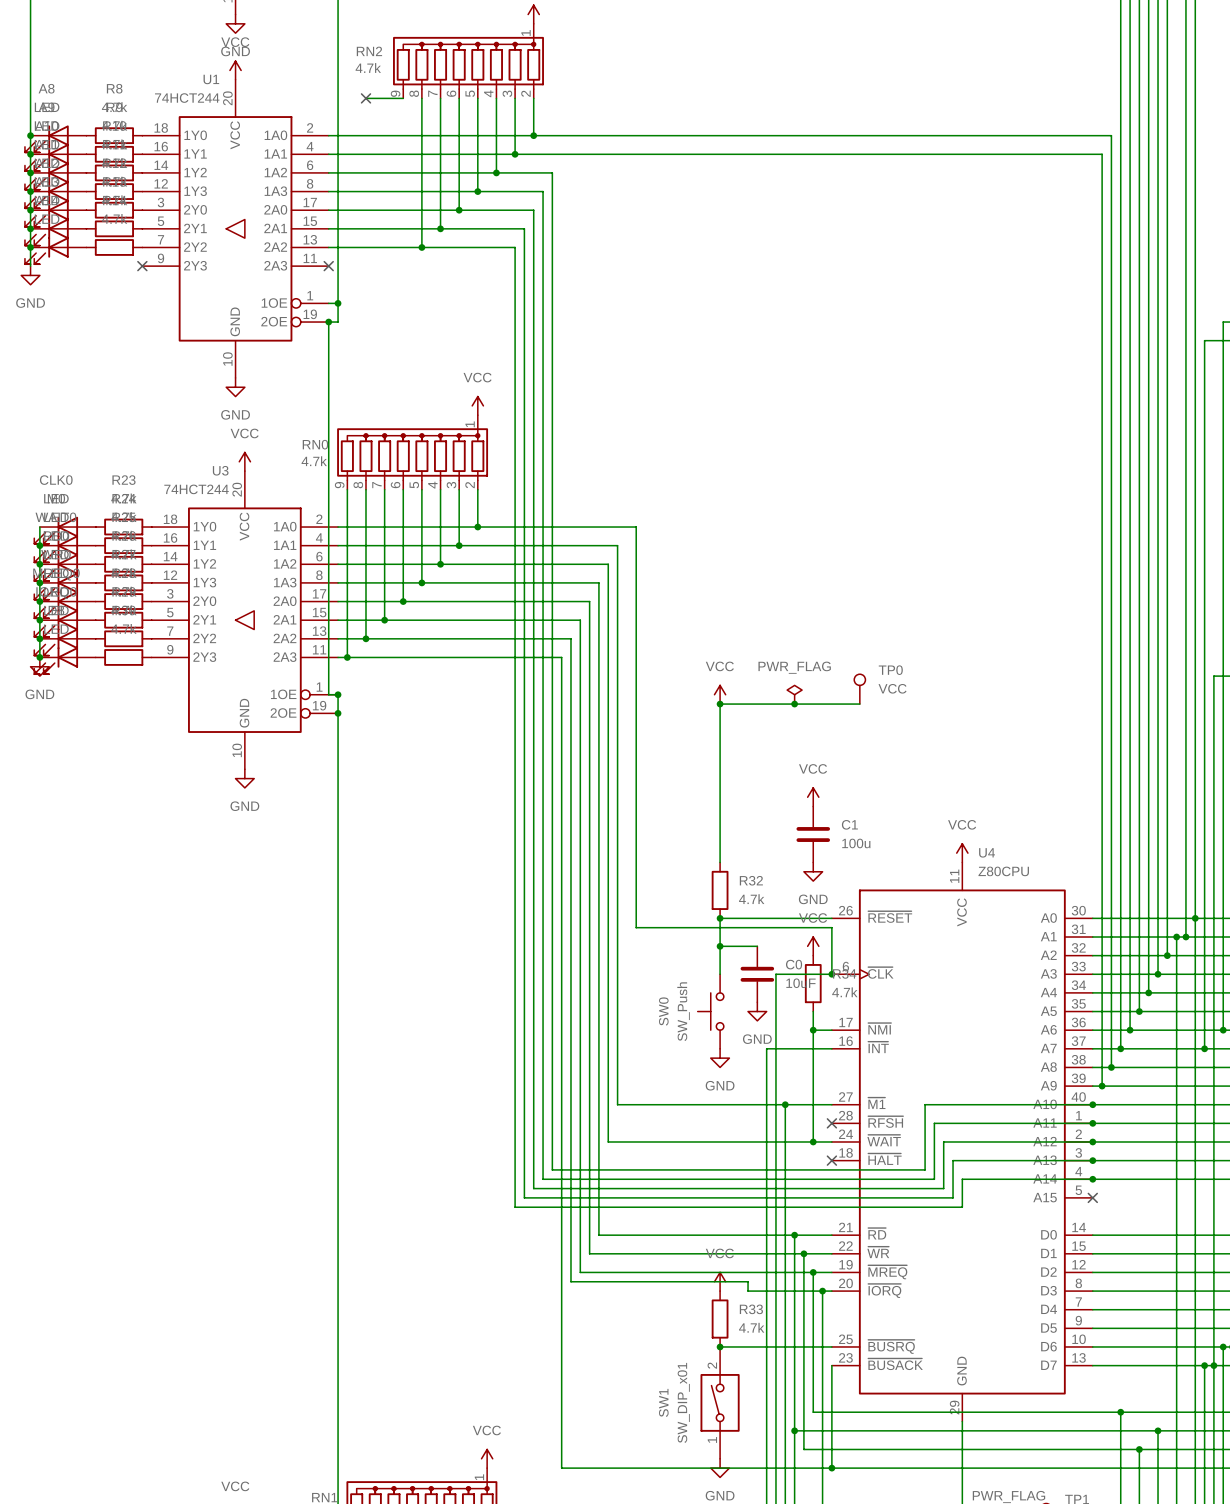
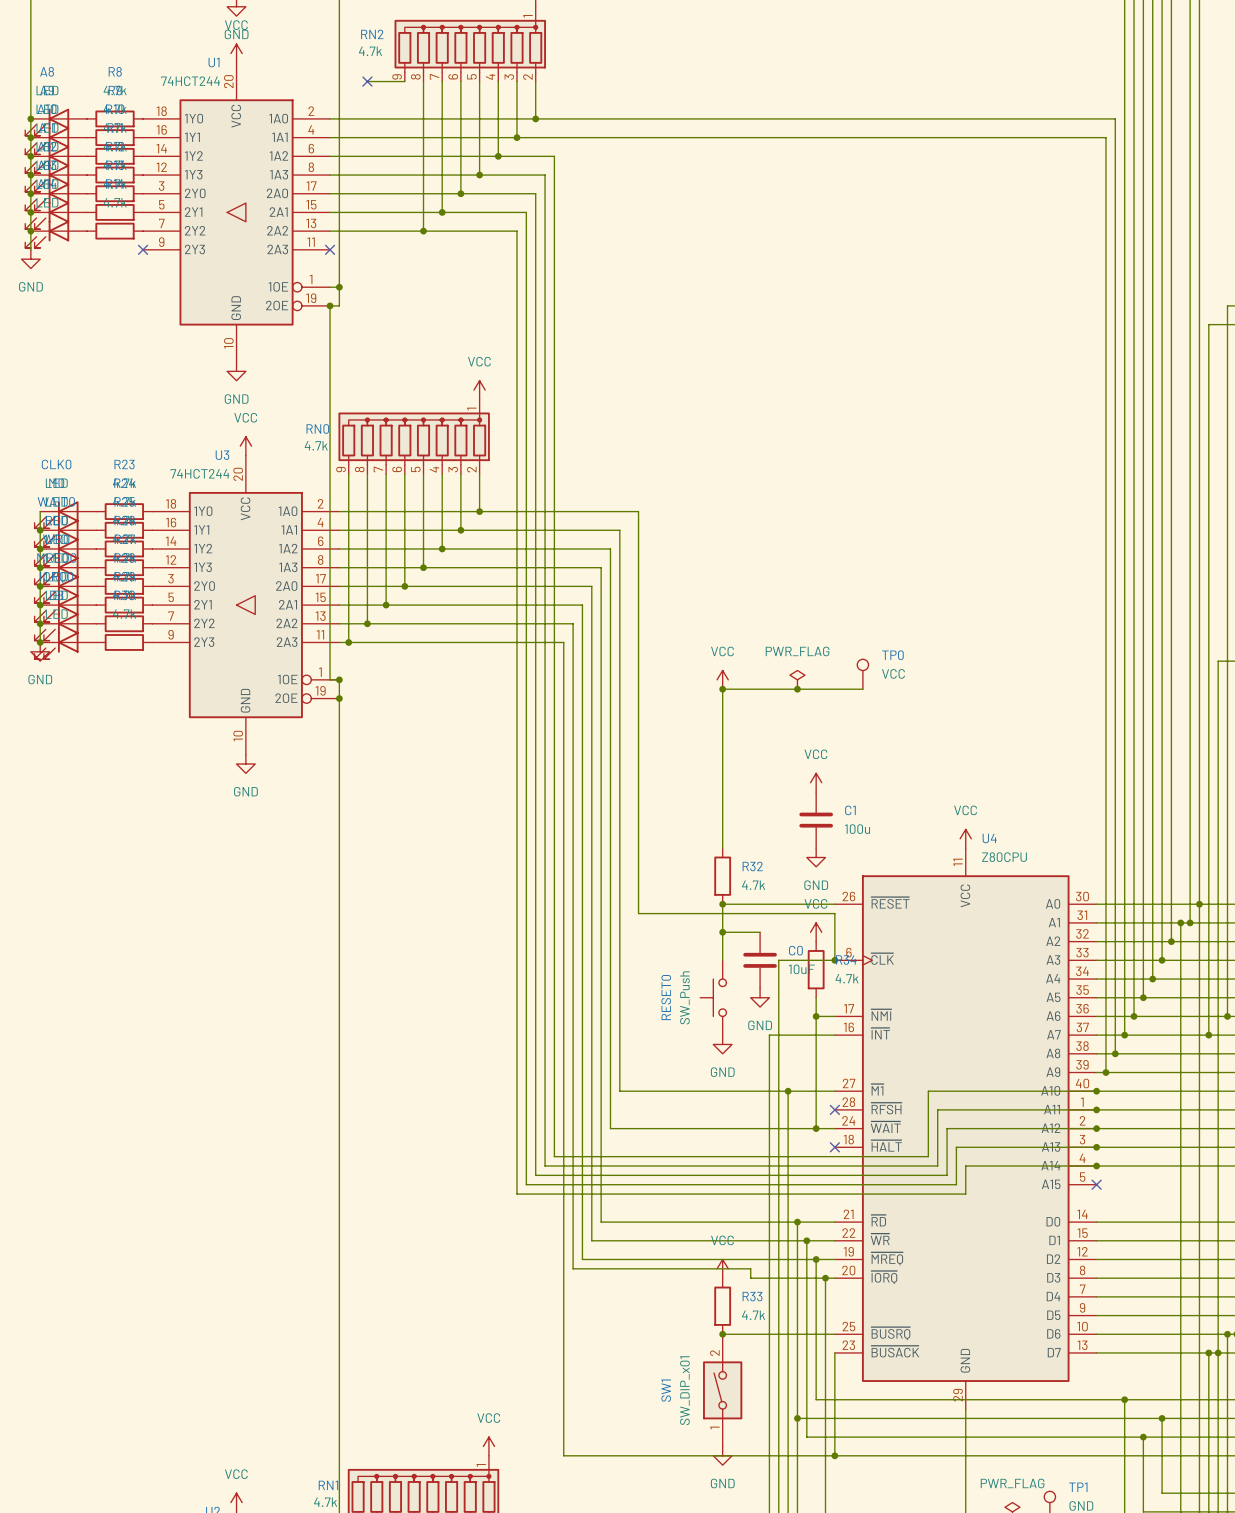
SW0 name: SW0 (663, 1011) -> RESET0 (666, 997)

